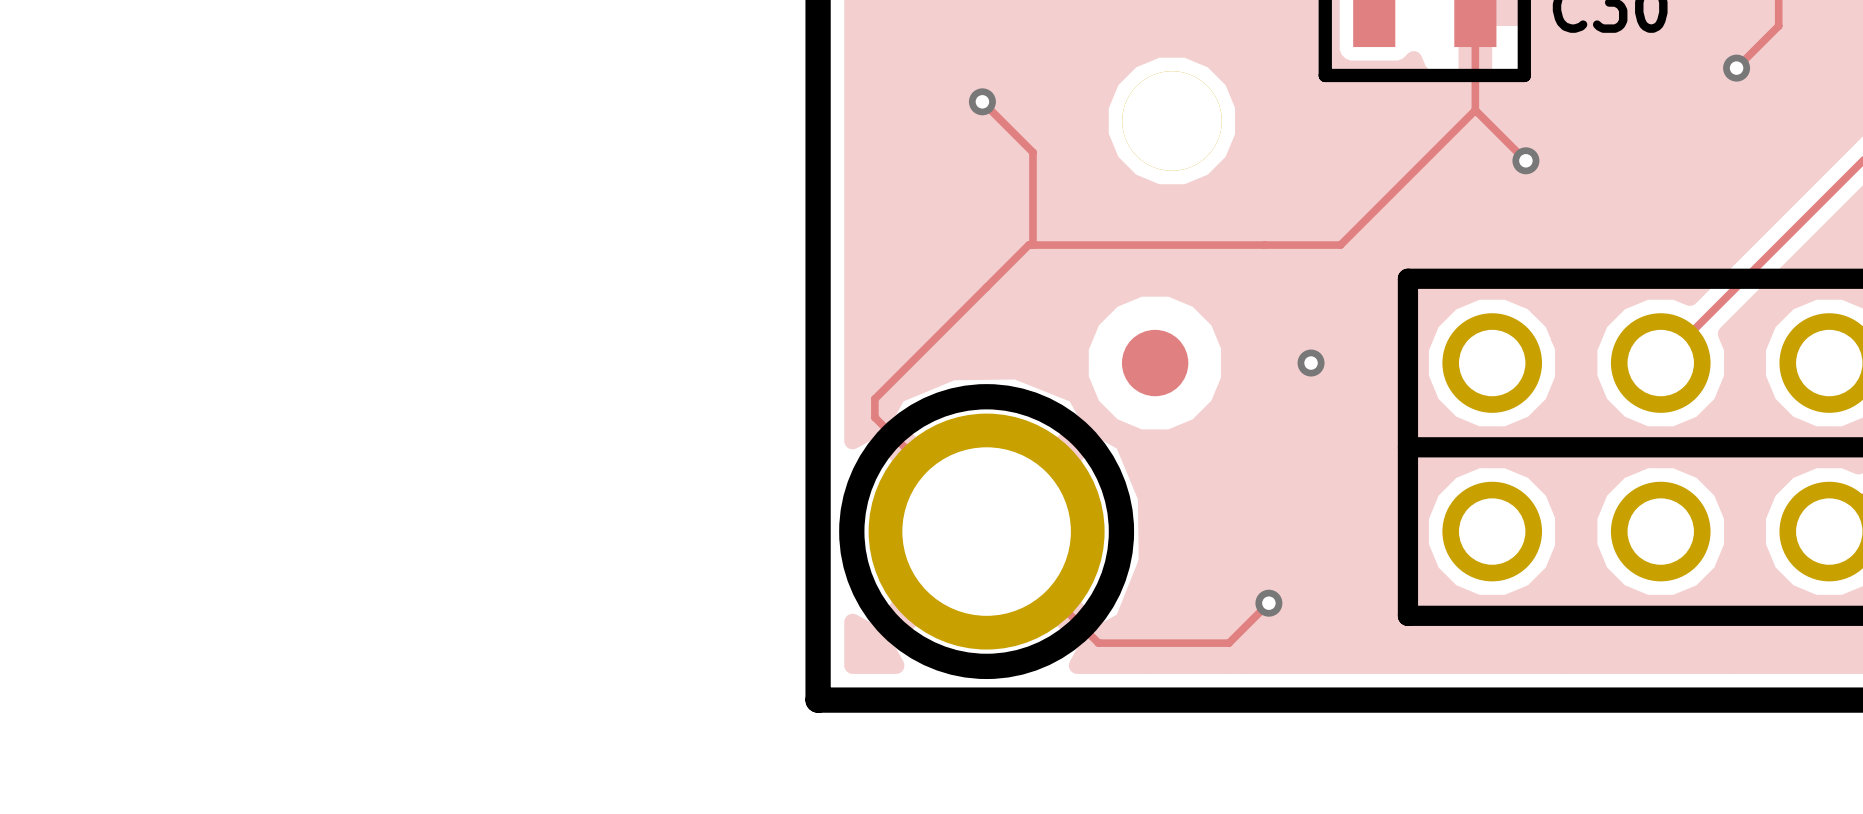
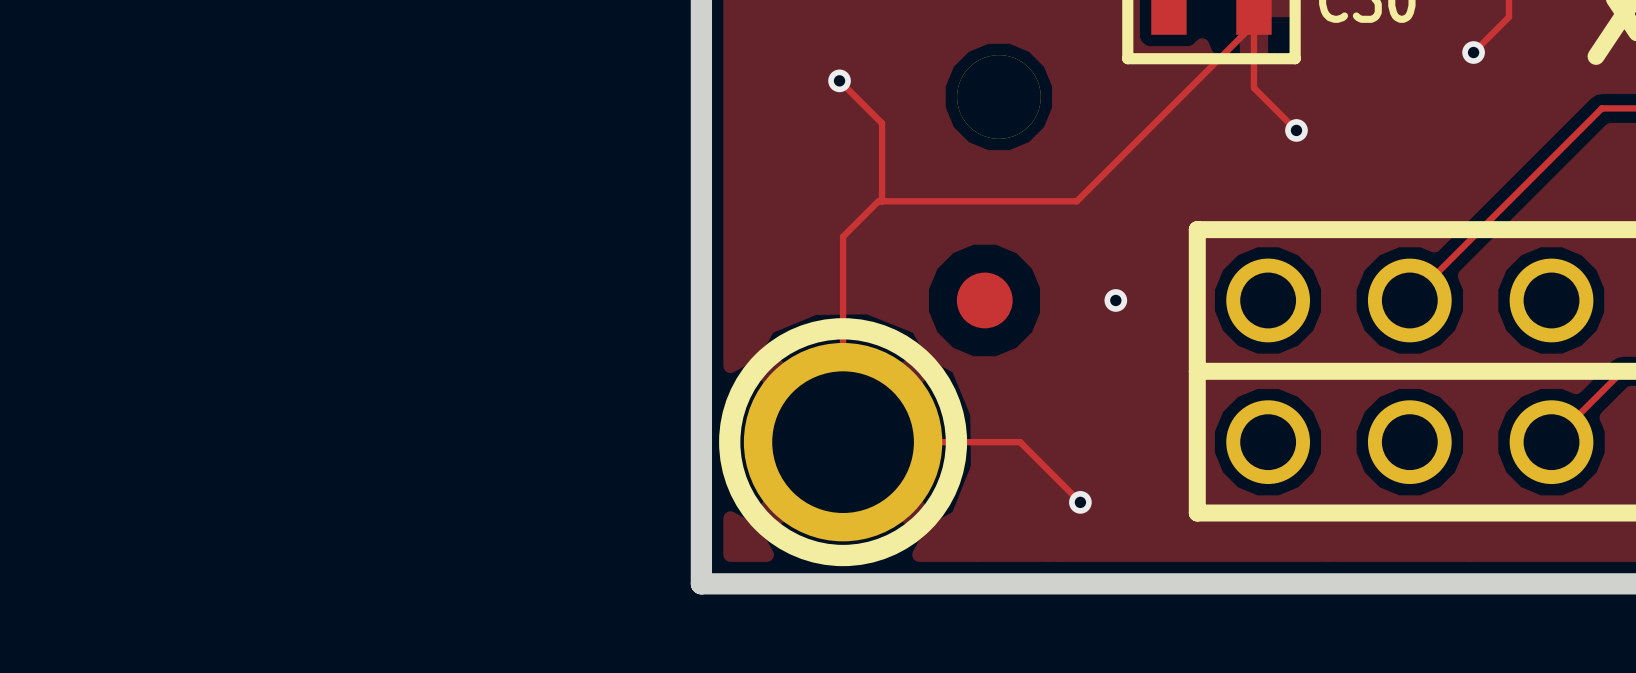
track: (1475, 110) (1340, 245) (1264, 245) -> (1253, 24) (1076, 201)
track: (986, 287) (874, 398) (874, 417) (986, 529) -> (843, 236) (843, 440)
track: (986, 531) (1098, 643) (1228, 643) (1268, 603) -> (843, 442) (1020, 442) (1080, 502)

